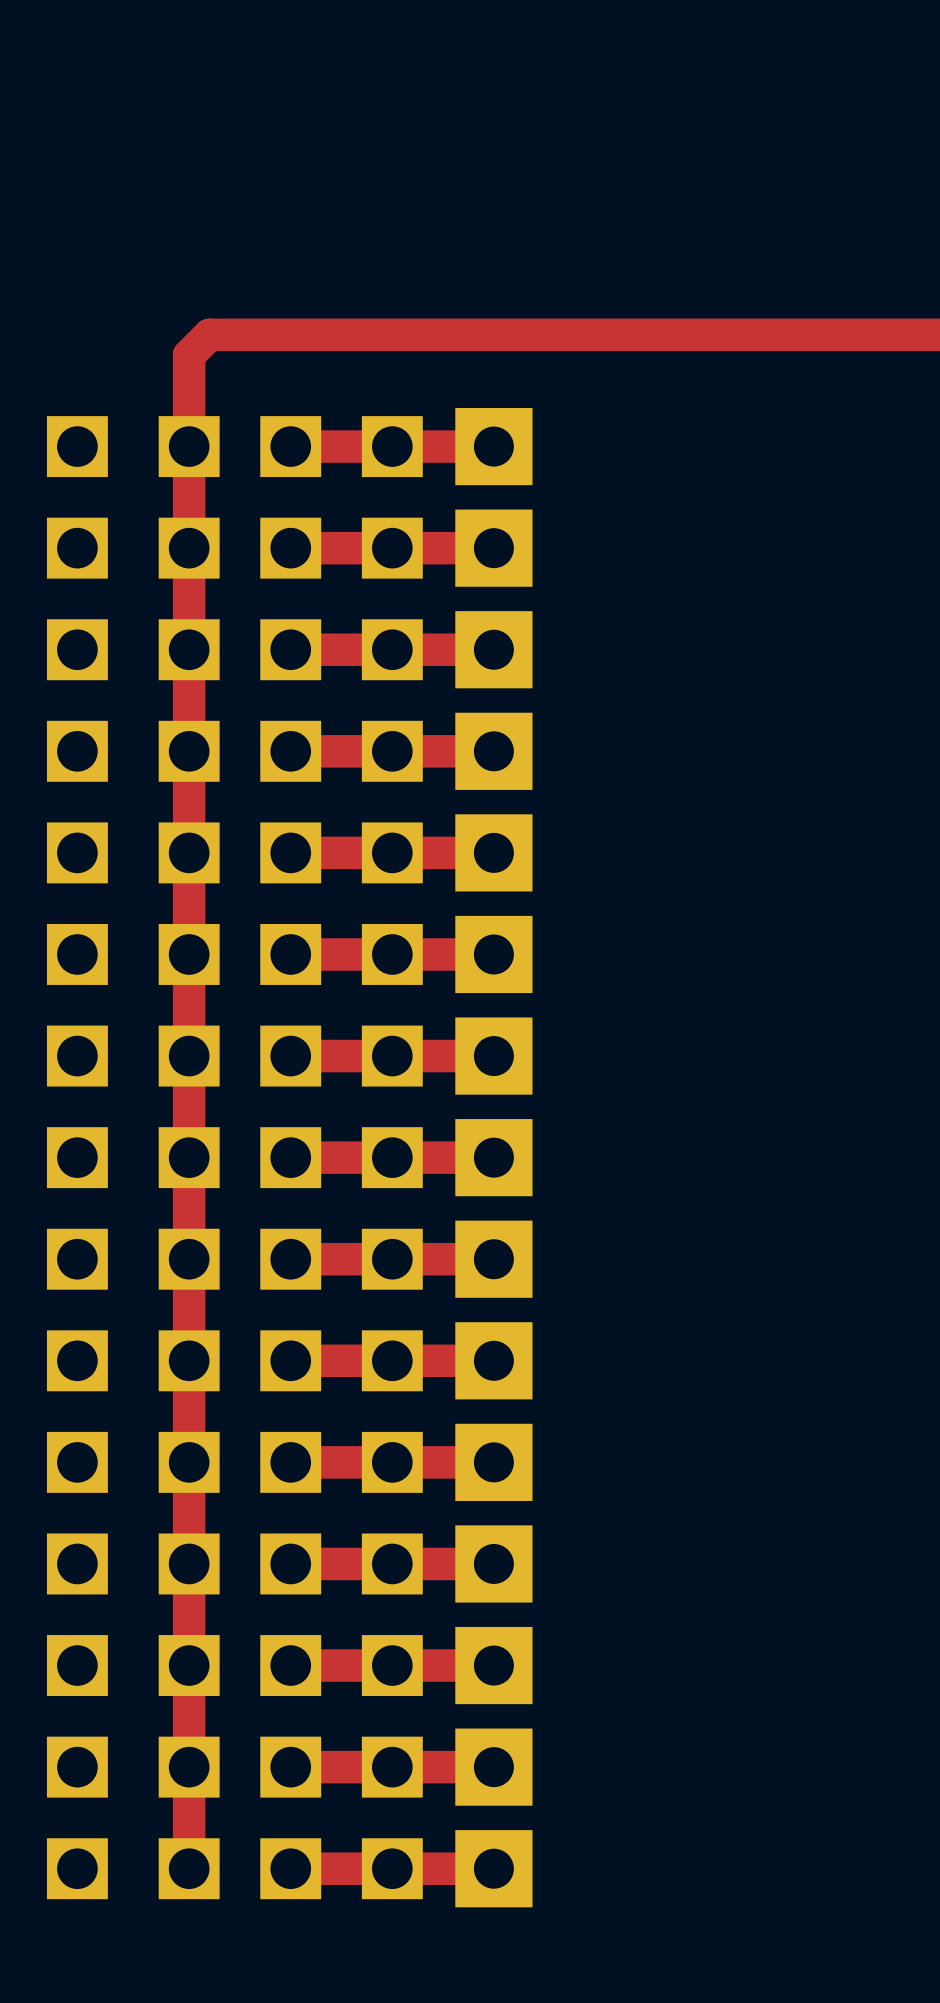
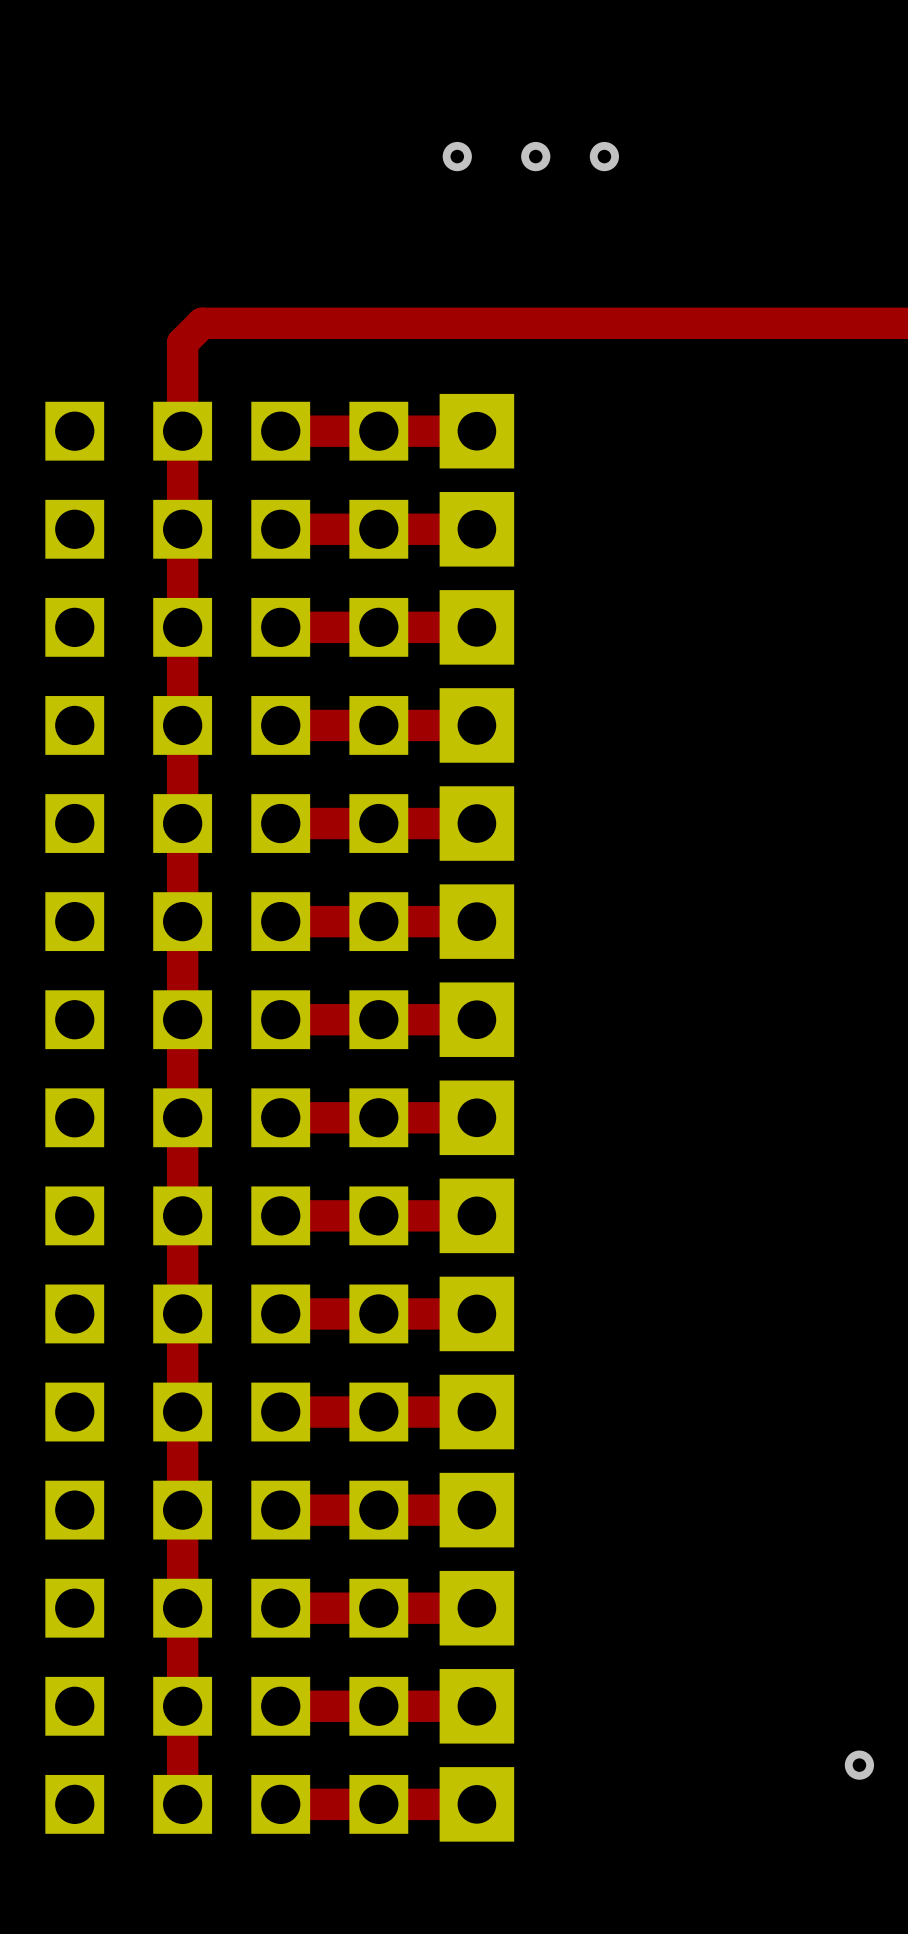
via: none -> (457, 156)
via: none -> (535, 156)
via: none -> (604, 156)
via: none -> (859, 1765)

